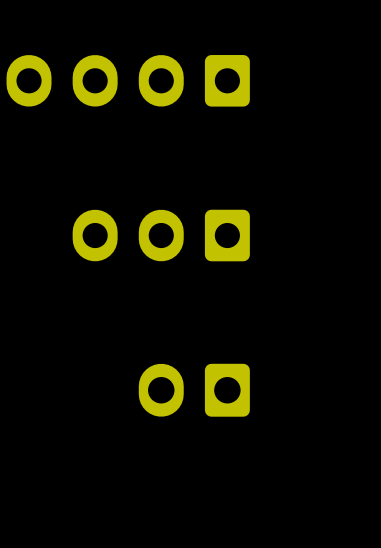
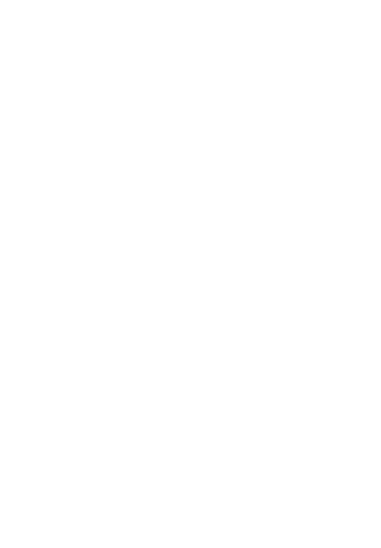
part: (128, 80) -> none
part: (161, 235) -> none
part: (194, 390) -> none

